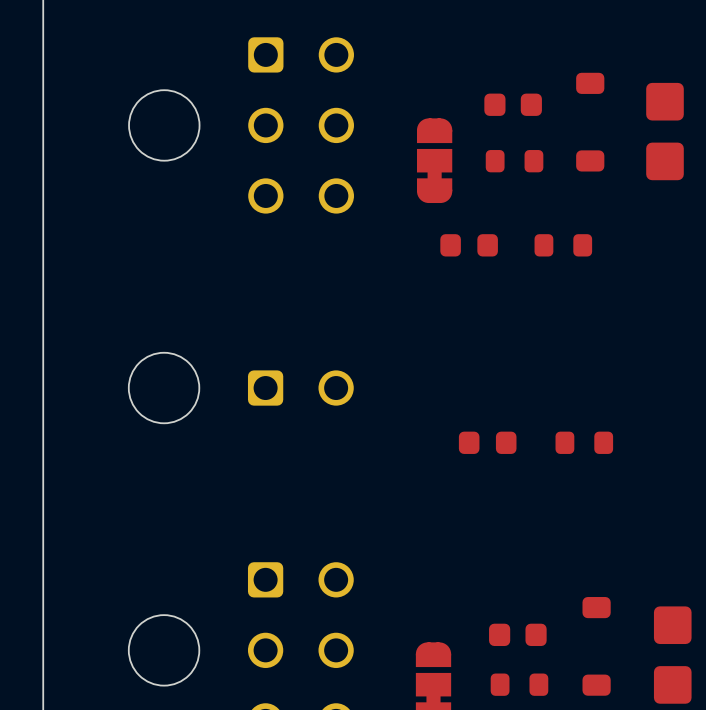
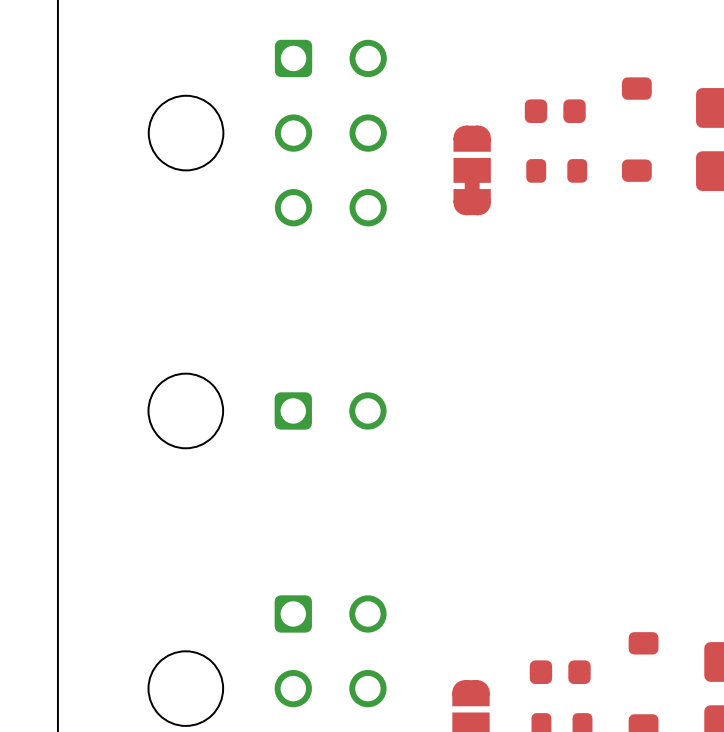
part: (469, 245) -> none
part: (563, 245) -> none
part: (487, 442) -> none
part: (584, 442) -> none

